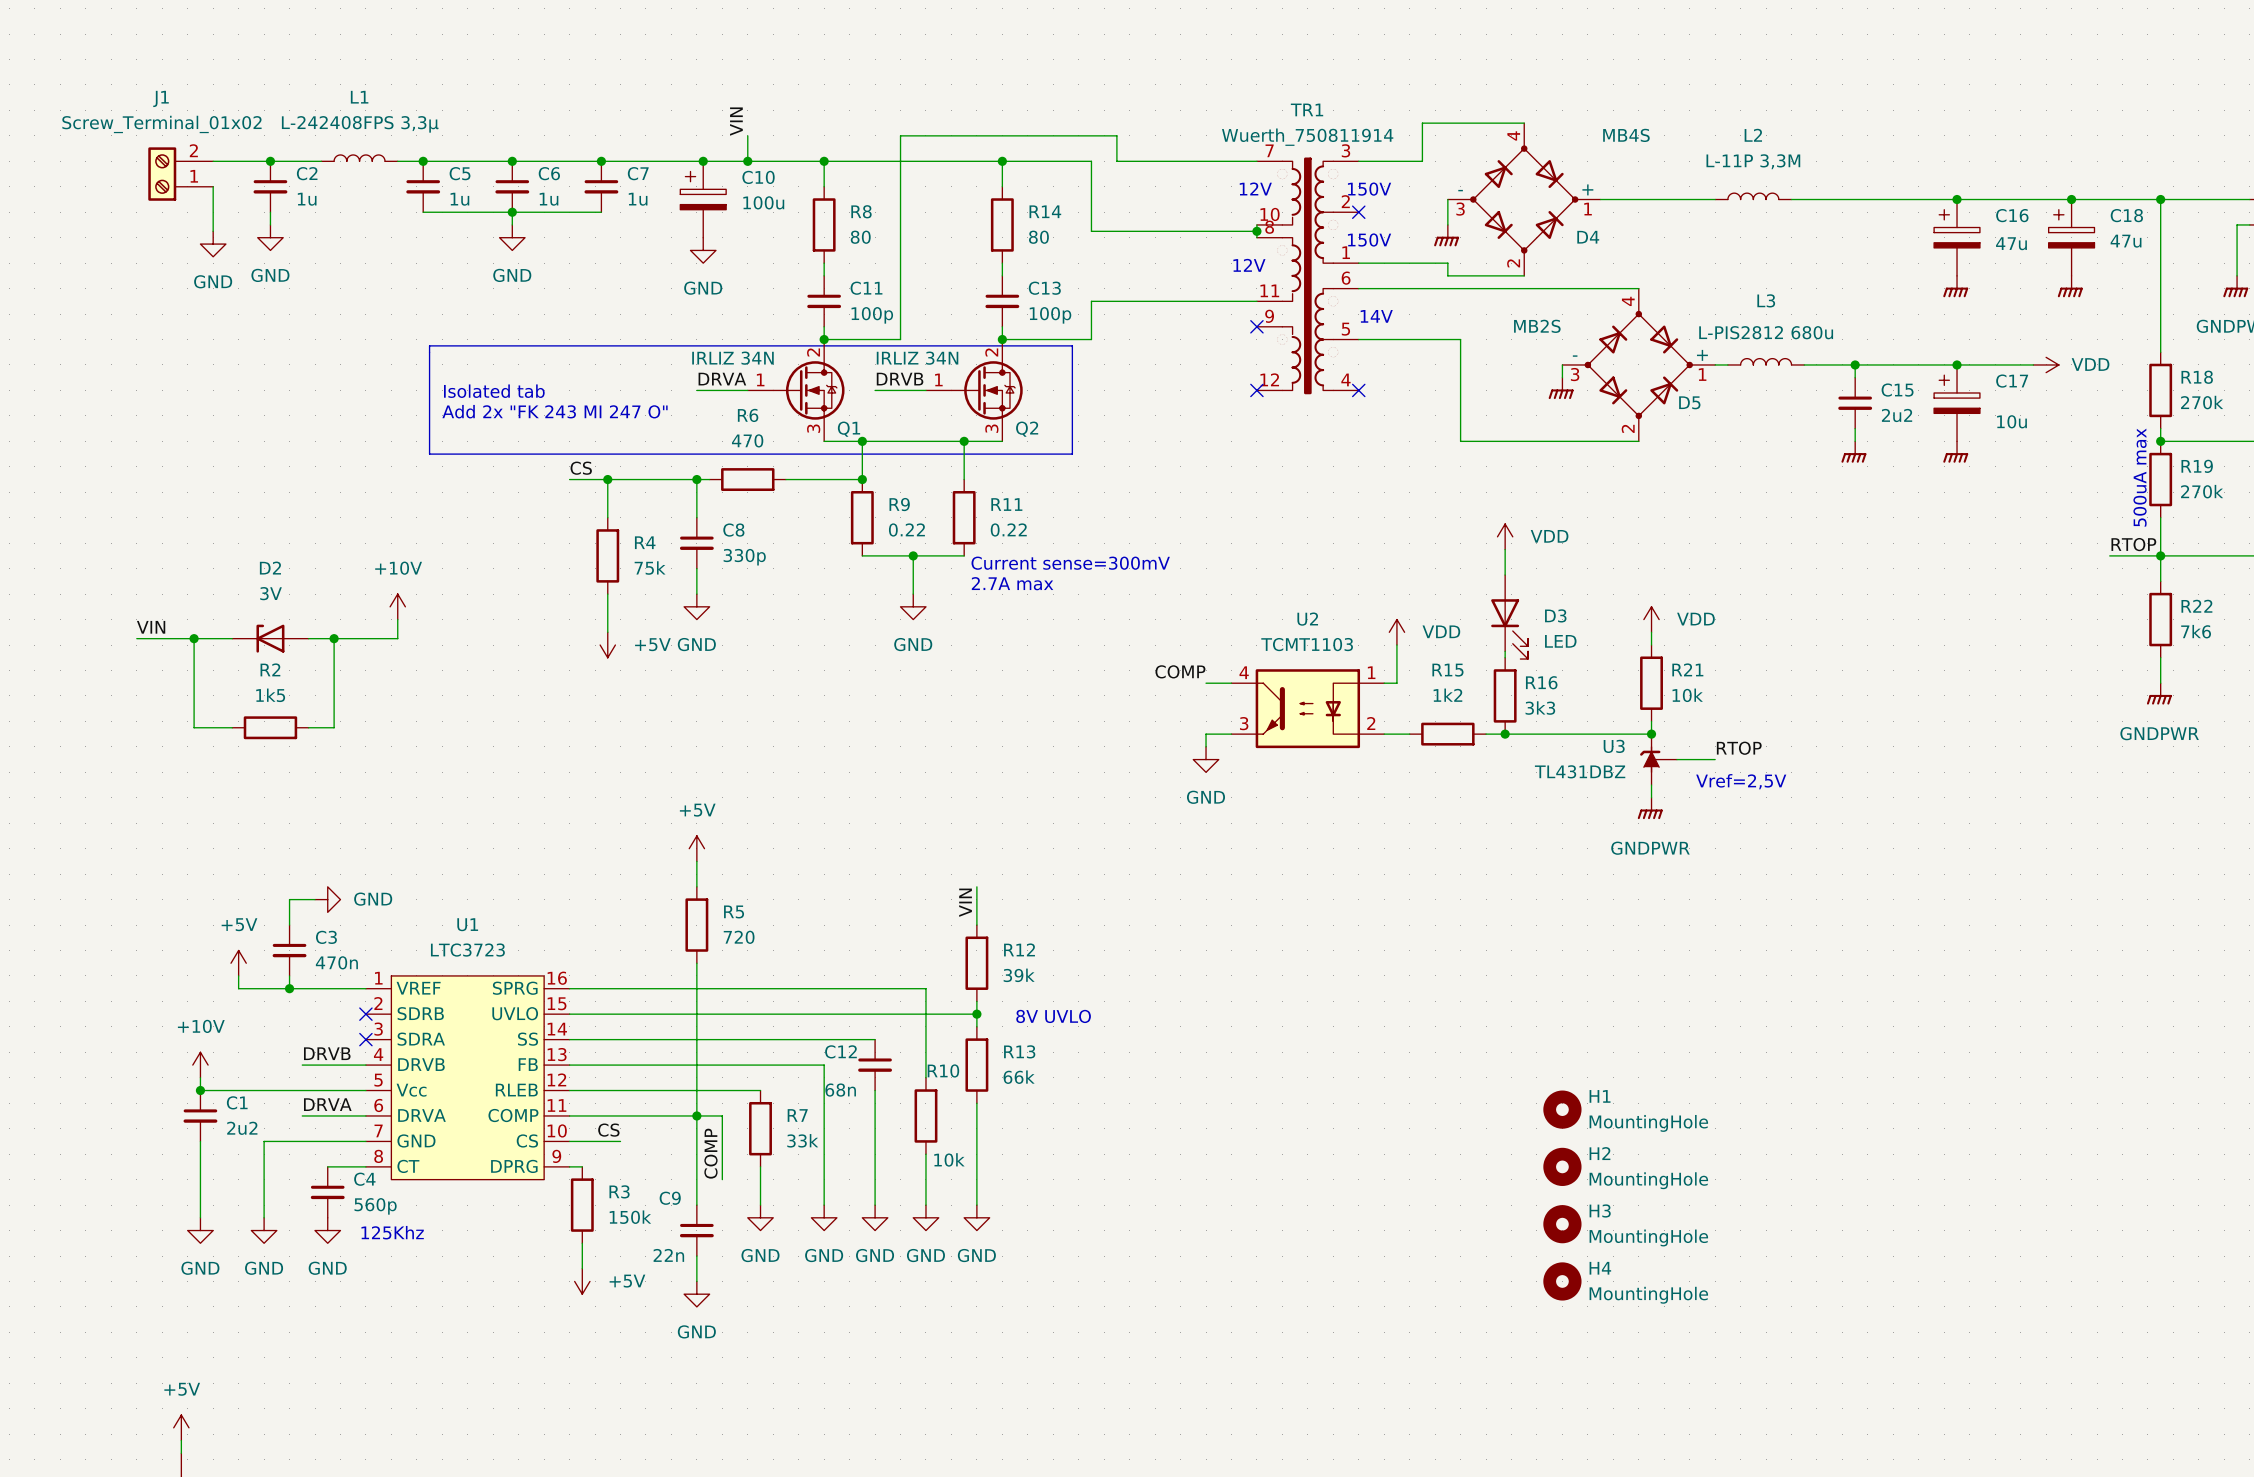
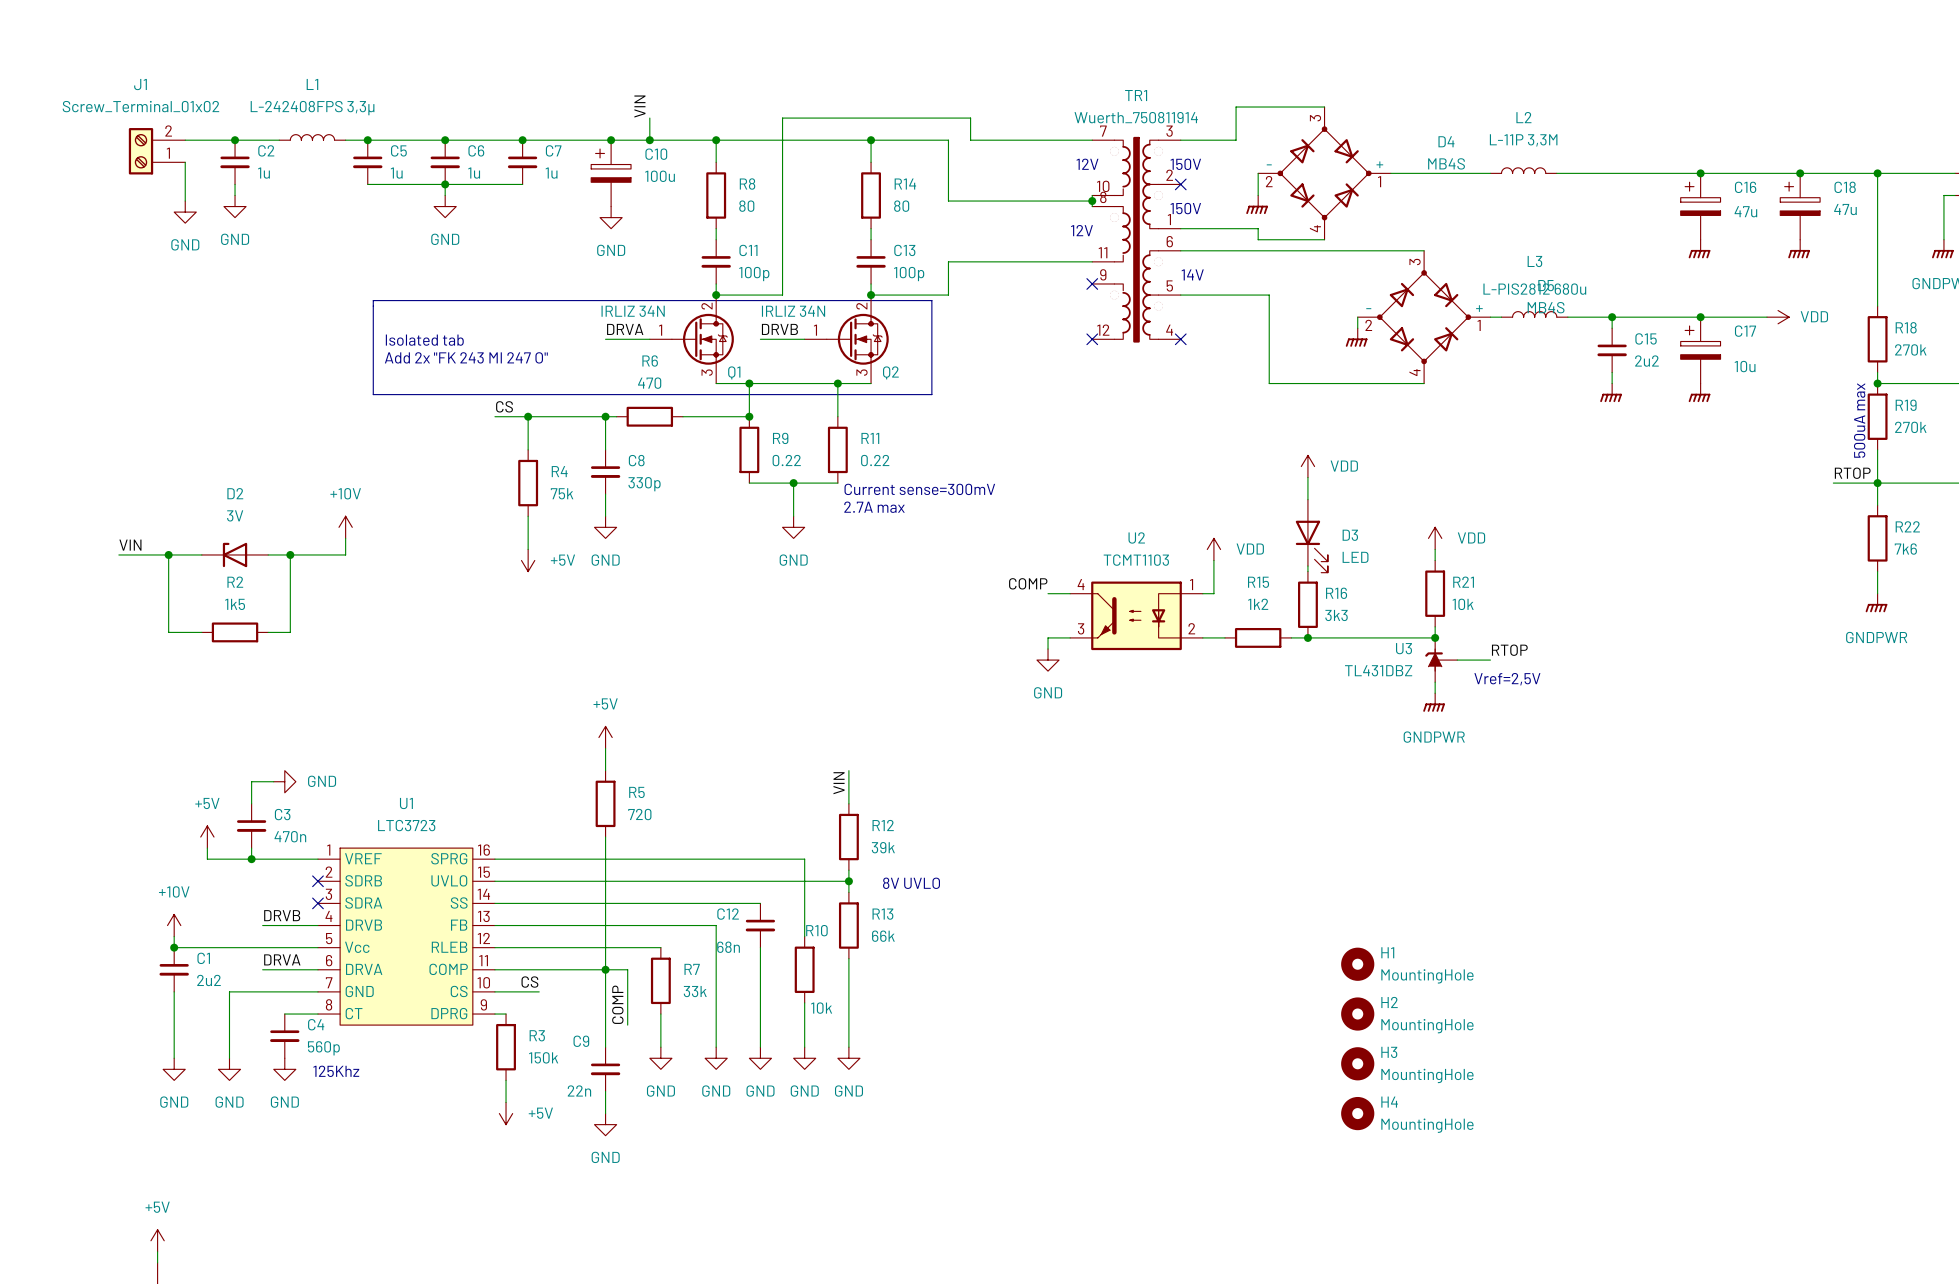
D4 pin number: 4 (1513, 135) -> 3 (1315, 118)
D4 value position: MB4S (1626, 135) -> MB4S (1446, 163)
D4 pin number: 3 (1460, 209) -> 2 (1269, 181)
D4 name position: D4 (1588, 237) -> D4 (1446, 141)
D4 pin number: 2 (1513, 263) -> 4 (1315, 228)
D5 pin number: 4 (1628, 301) -> 3 (1415, 261)
D5 value: MB2S (1537, 326) -> MB4S (1546, 307)
D5 pin number: 3 (1575, 374) -> 2 (1368, 325)
D5 name position: D5 (1689, 402) -> D5 (1546, 285)
D5 pin number: 2 (1628, 428) -> 4 (1414, 372)

